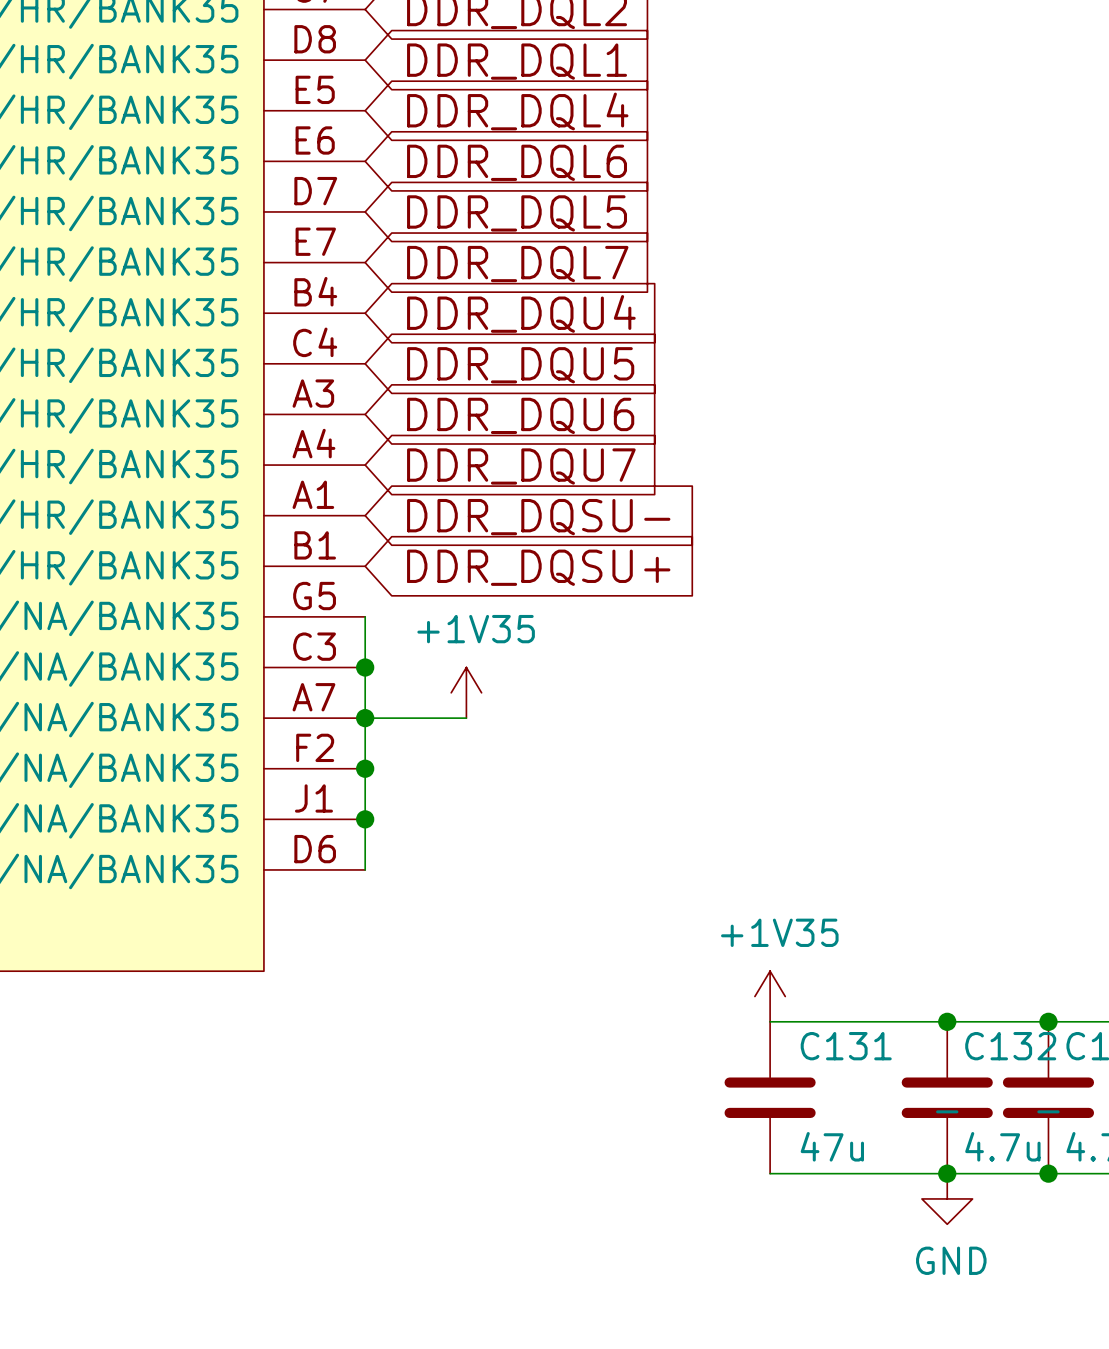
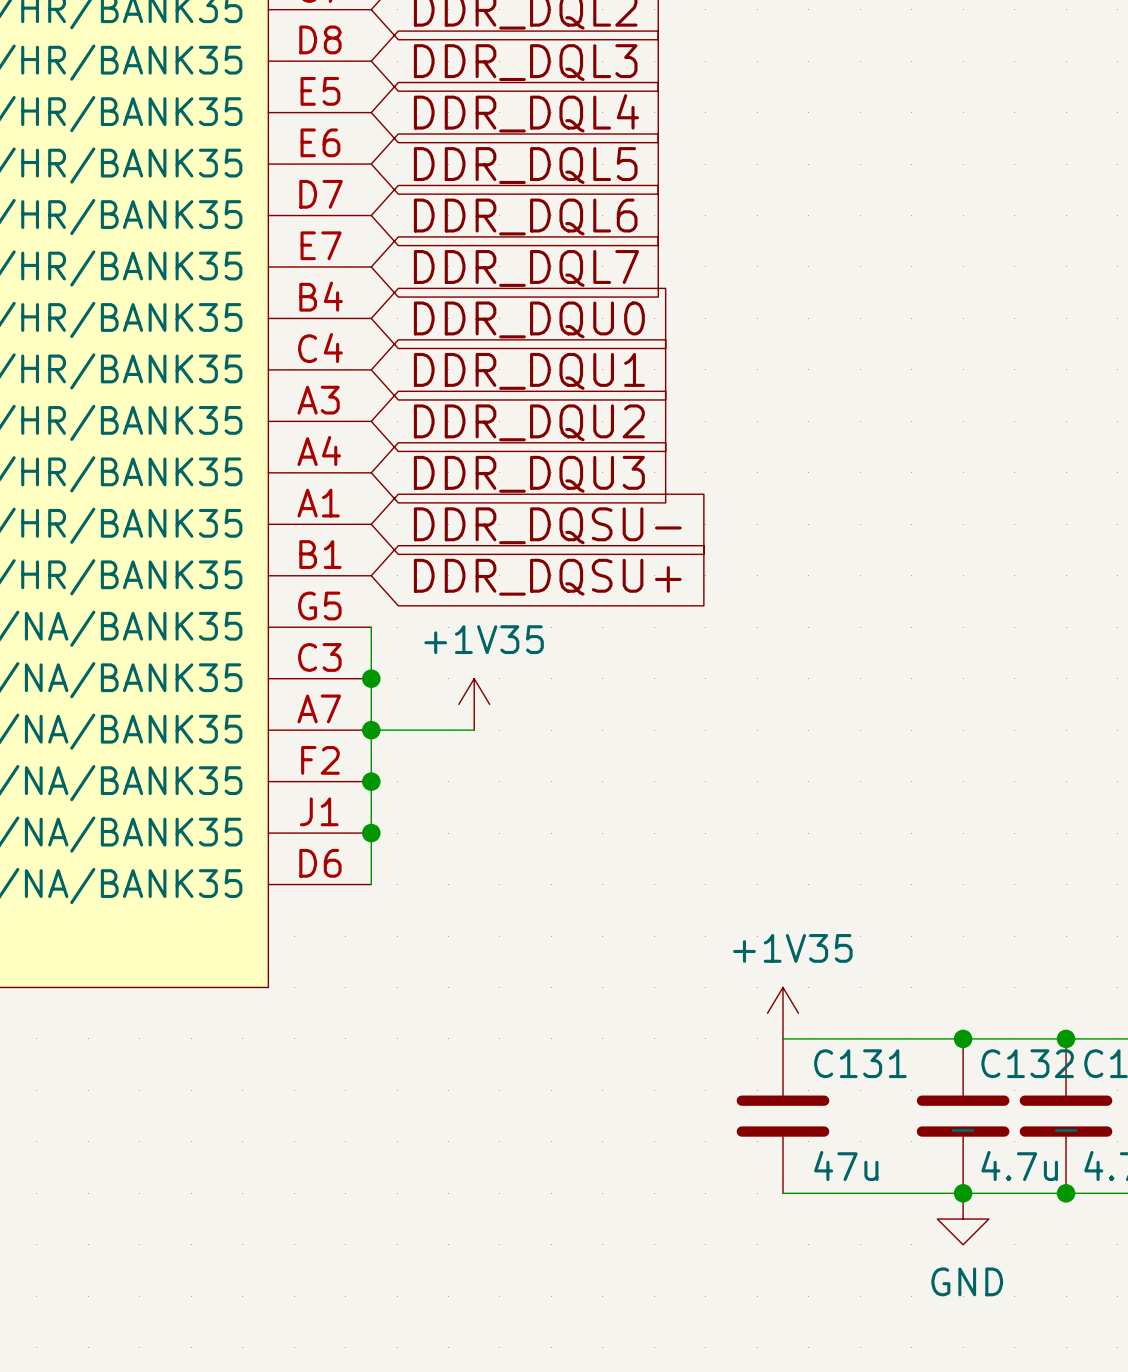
global label: DDR_DQL1 (517, 61) -> DDR_DQL3 (525, 62)
global label: DDR_DQL6 (517, 162) -> DDR_DQL5 (525, 165)
global label: DDR_DQL5 (517, 213) -> DDR_DQL6 (525, 217)
global label: DDR_DQU4 (521, 313) -> DDR_DQU0 (529, 319)
global label: DDR_DQU5 (520, 365) -> DDR_DQU1 (529, 371)
global label: DDR_DQU6 (520, 415) -> DDR_DQU2 (529, 422)
global label: DDR_DQU7 (521, 466) -> DDR_DQU3 (529, 474)

